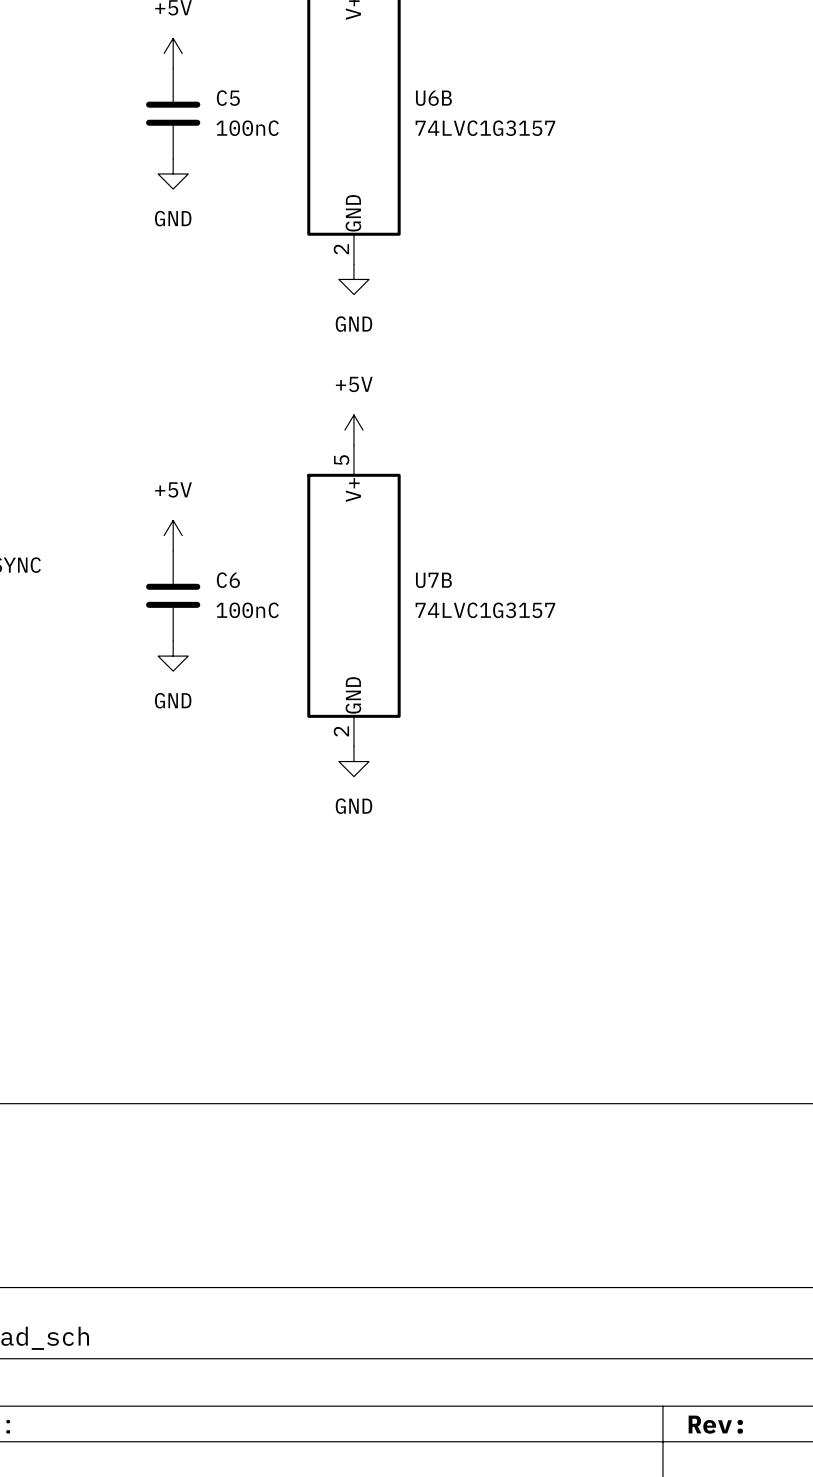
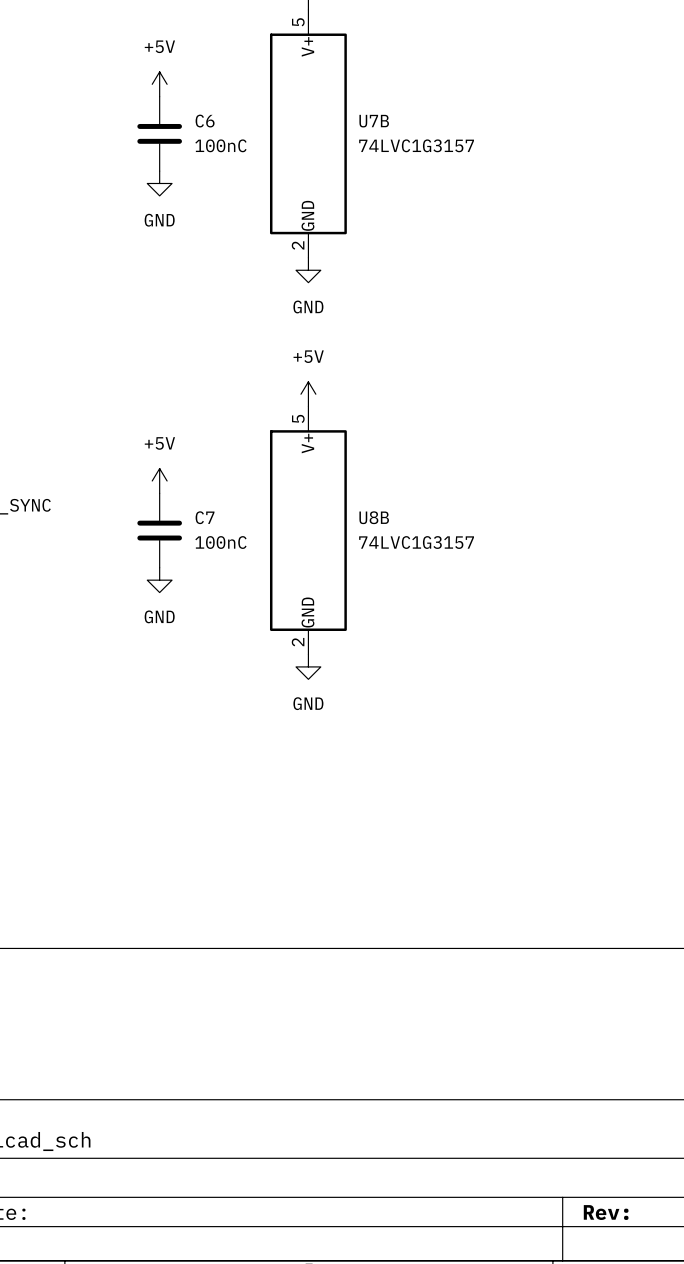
C5 name: C5 (228, 98) -> C6 (205, 121)
U6B name: U6B (433, 98) -> U7B (374, 121)
C6 name: C6 (228, 580) -> C7 (205, 517)
U7B name: U7B (433, 580) -> U8B (374, 517)

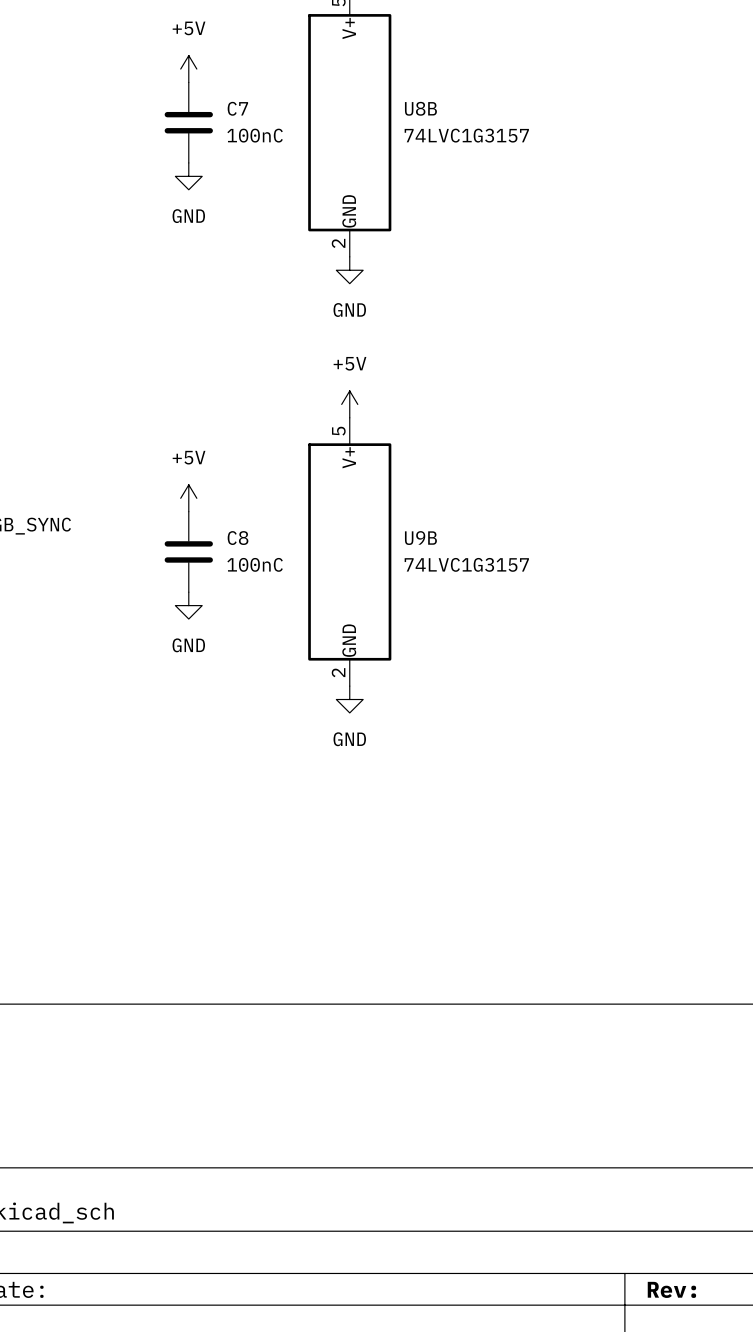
C6 name: C6 (205, 121) -> C7 (237, 108)
U7B name: U7B (374, 121) -> U8B (420, 108)
C7 name: C7 (205, 517) -> C8 (238, 538)
U8B name: U8B (374, 517) -> U9B (420, 538)

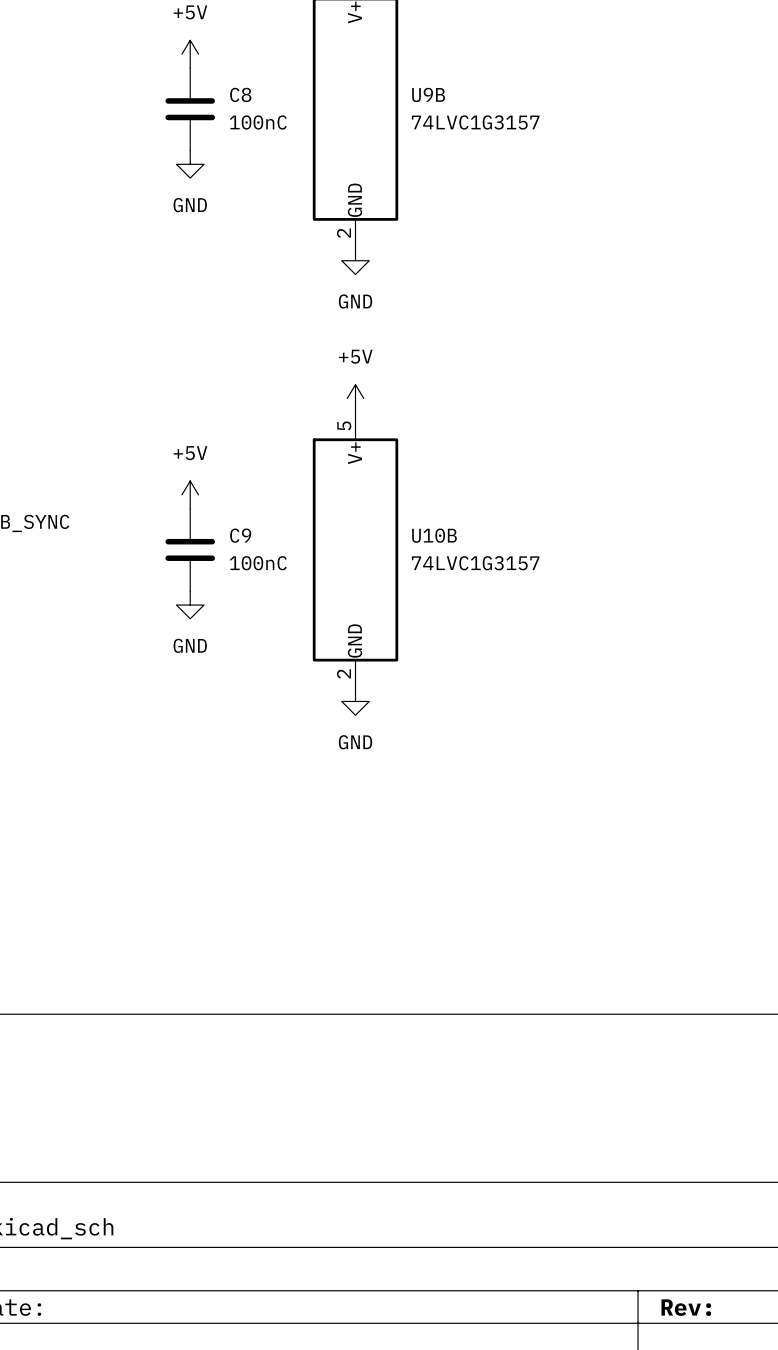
C7 name: C7 (237, 108) -> C8 (240, 94)
U8B name: U8B (420, 108) -> U9B (428, 94)
C8 name: C8 (238, 538) -> C9 (240, 535)
U9B name: U9B (420, 538) -> U10B (434, 535)

